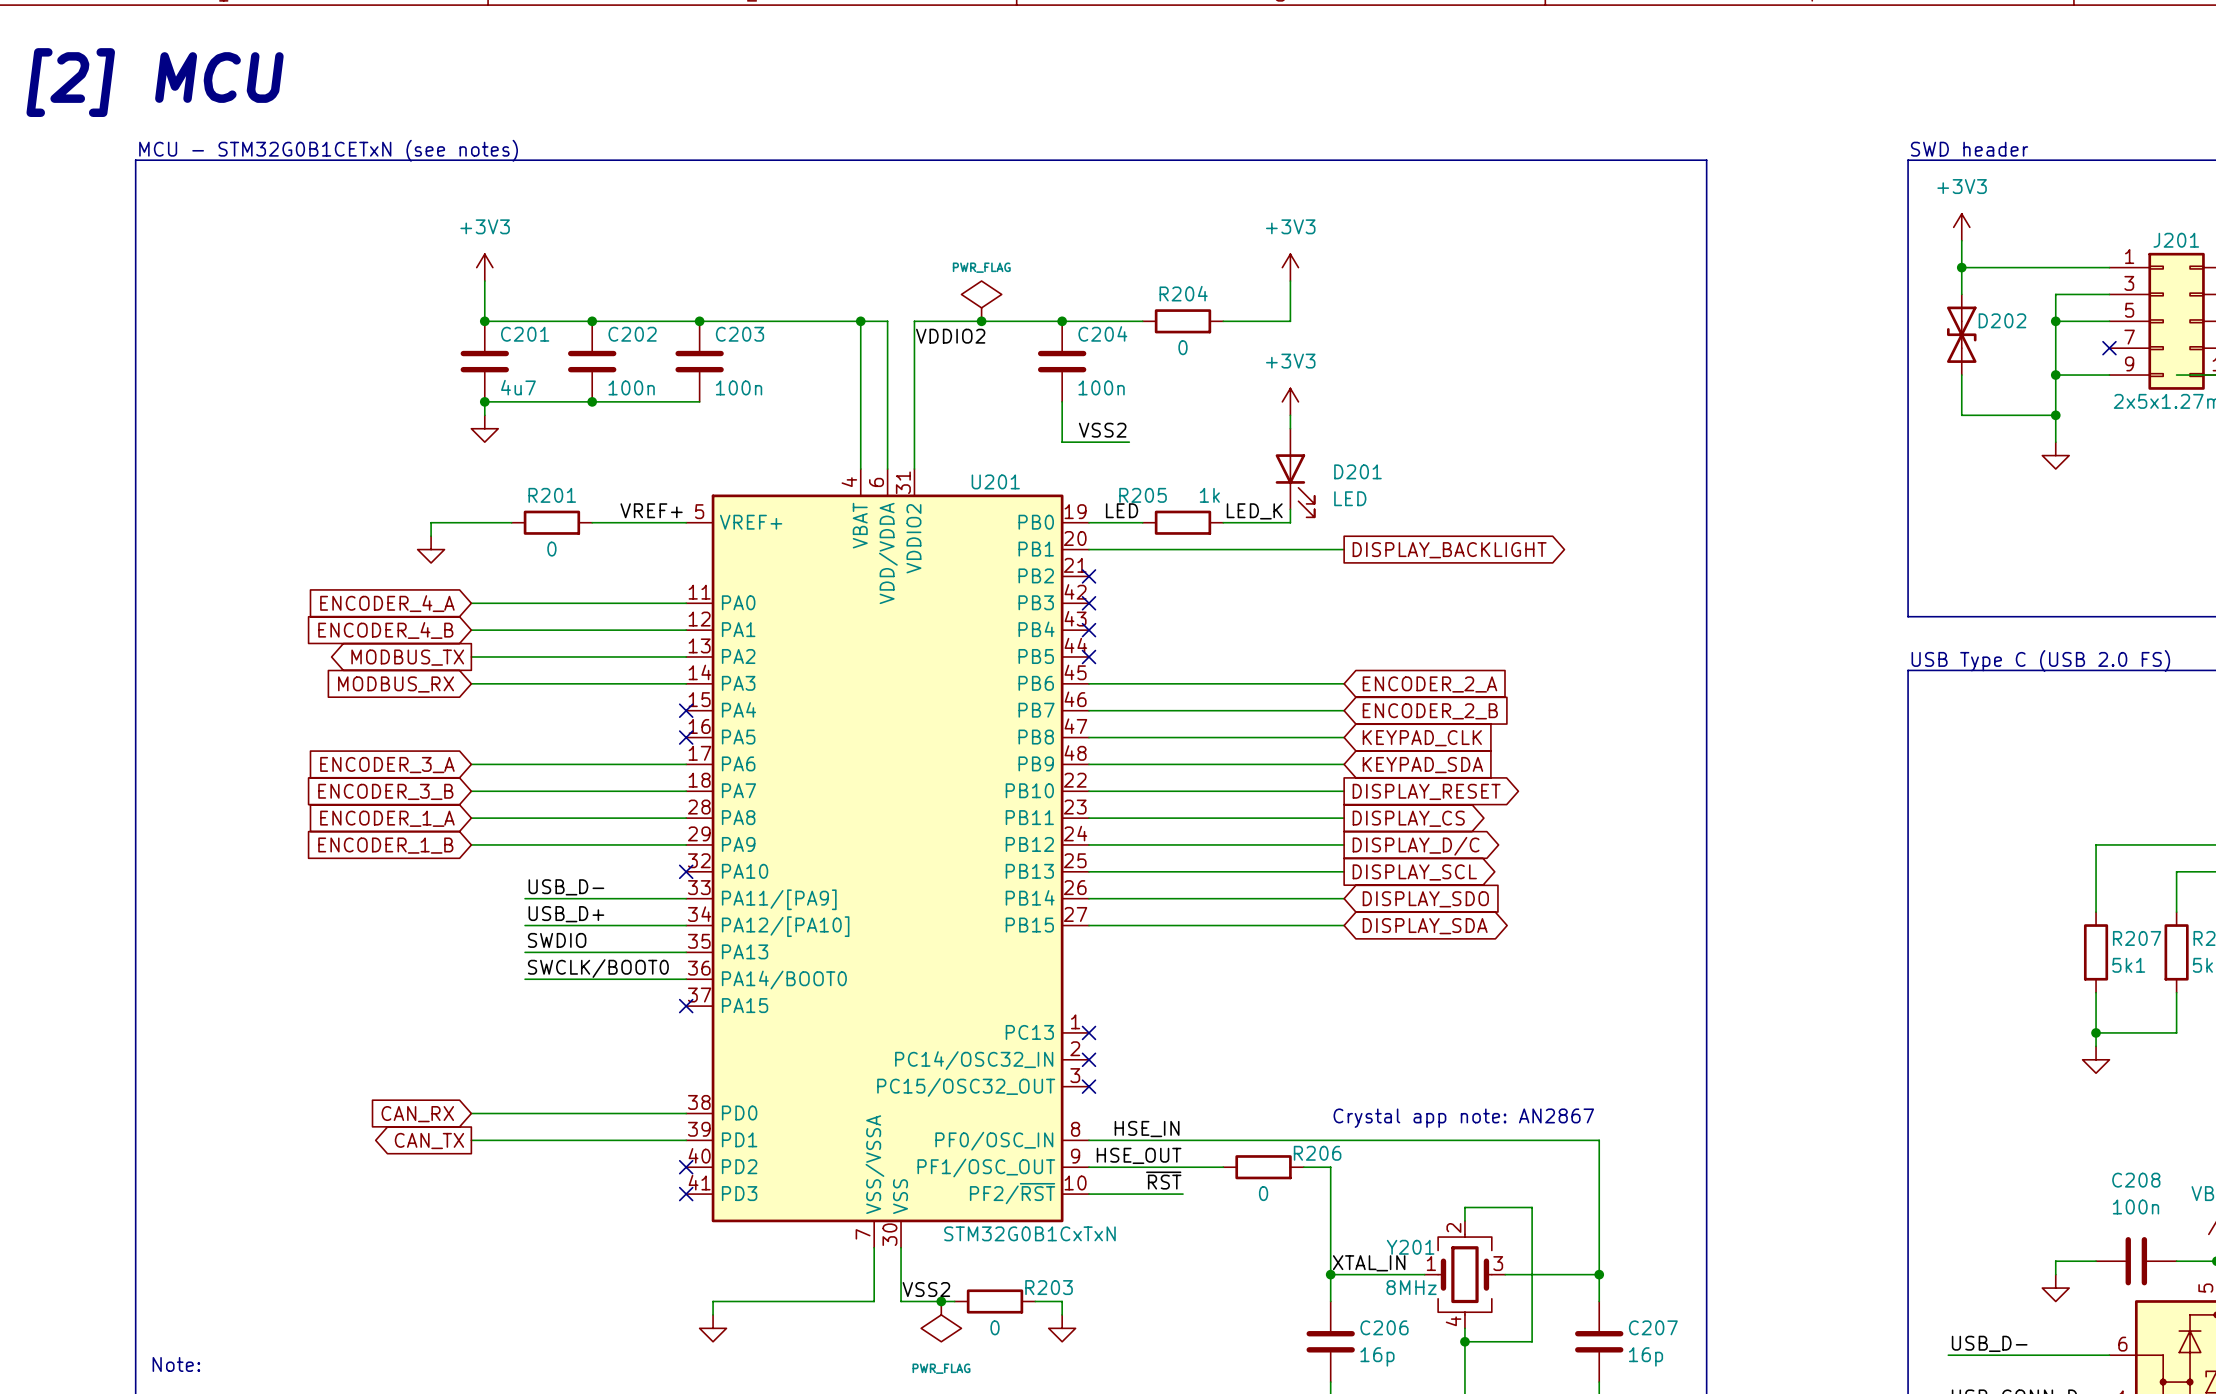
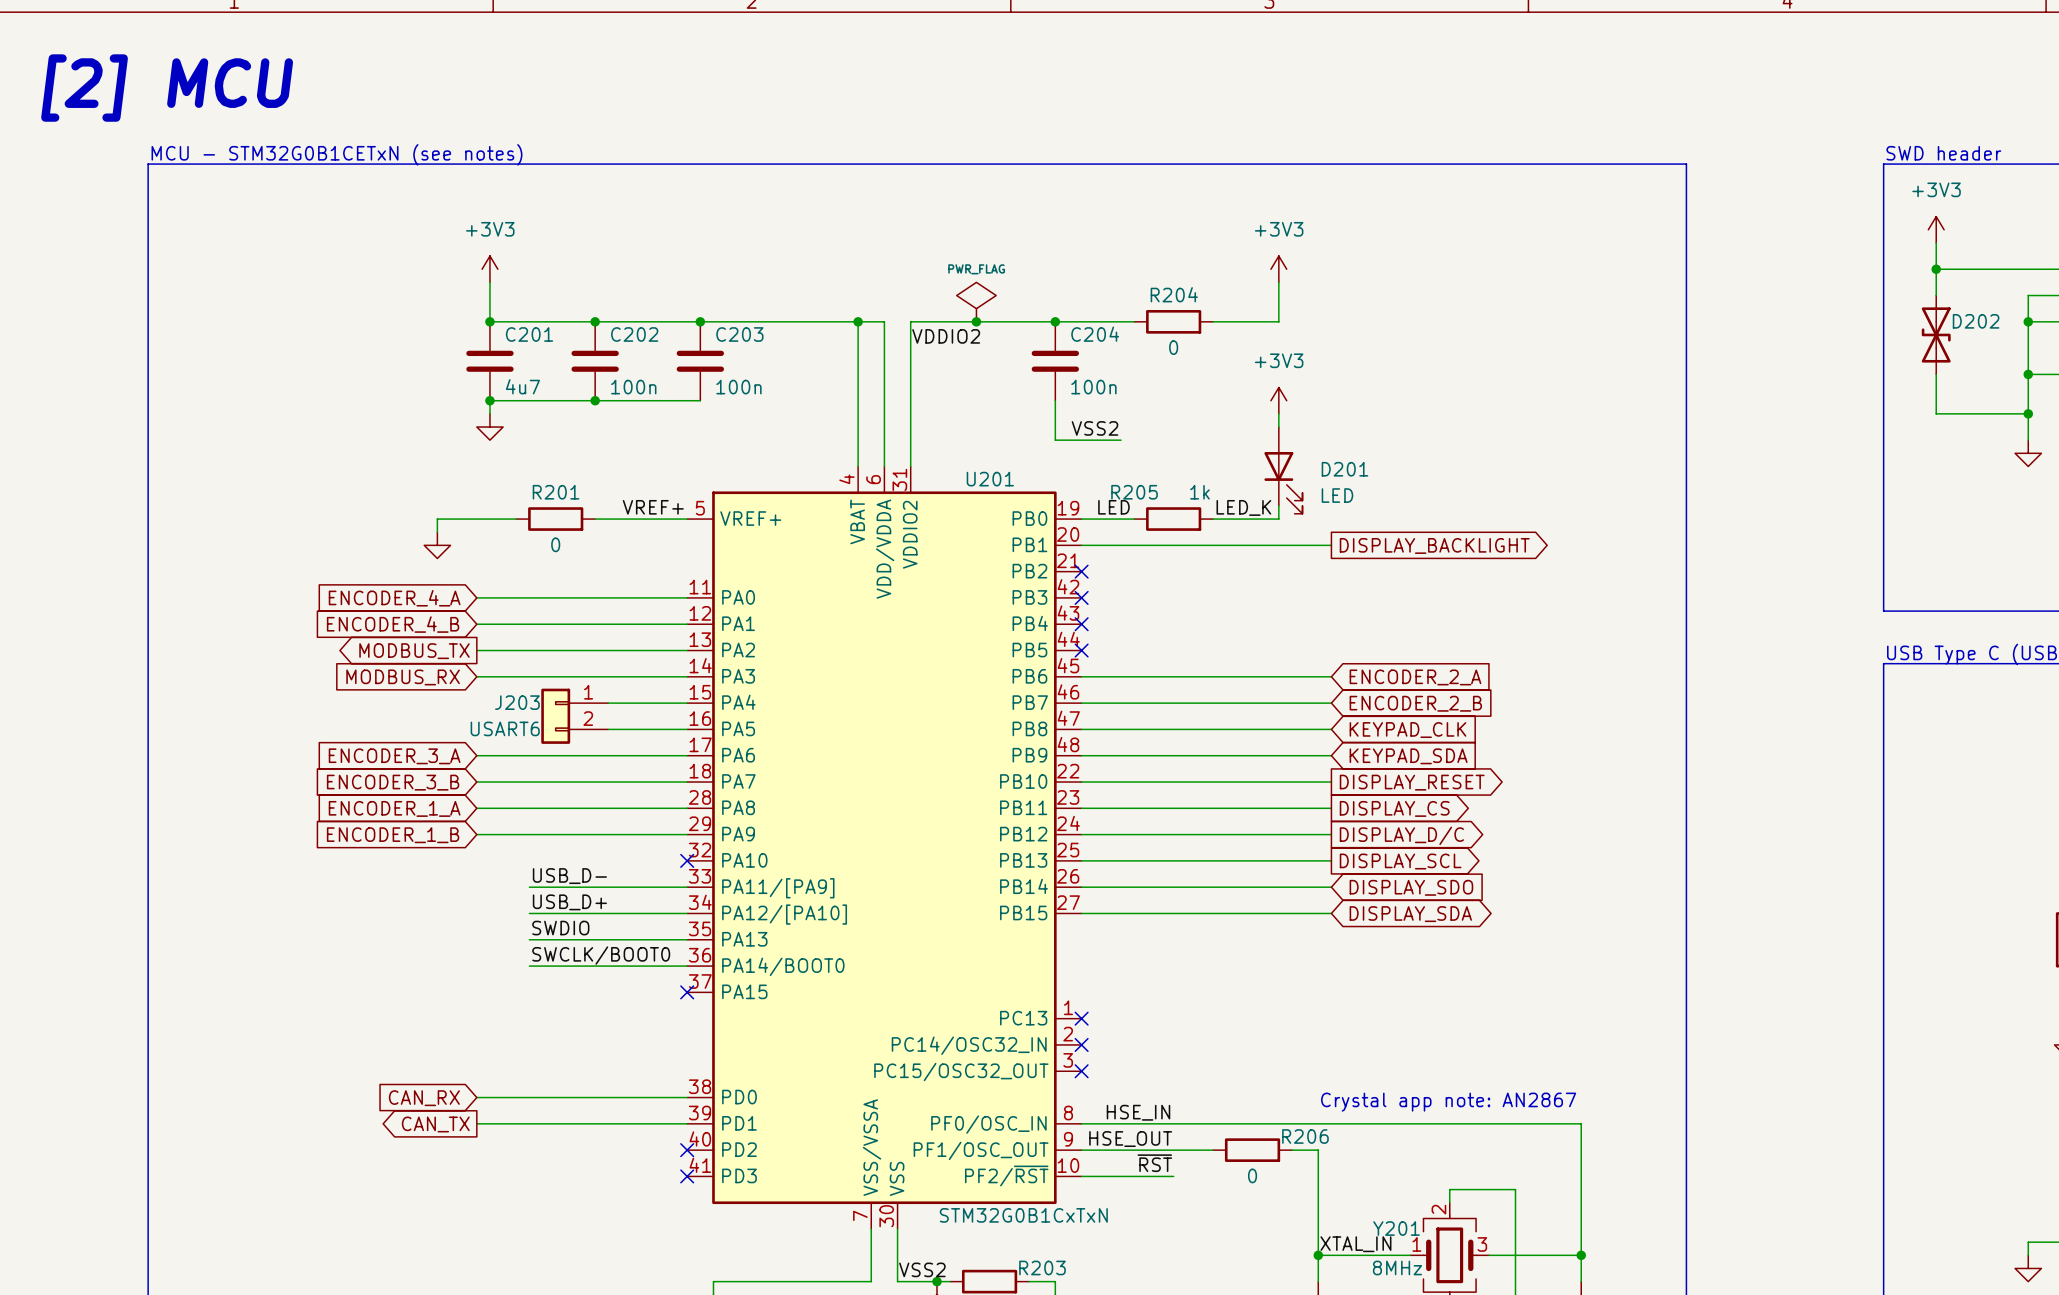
wire: none -> (608, 703) (687, 703)
no-connect mark: (686, 710) -> none
J203: none -> USART6 (574, 716)
wire: none -> (608, 729) (687, 729)
no-connect mark: (686, 737) -> none

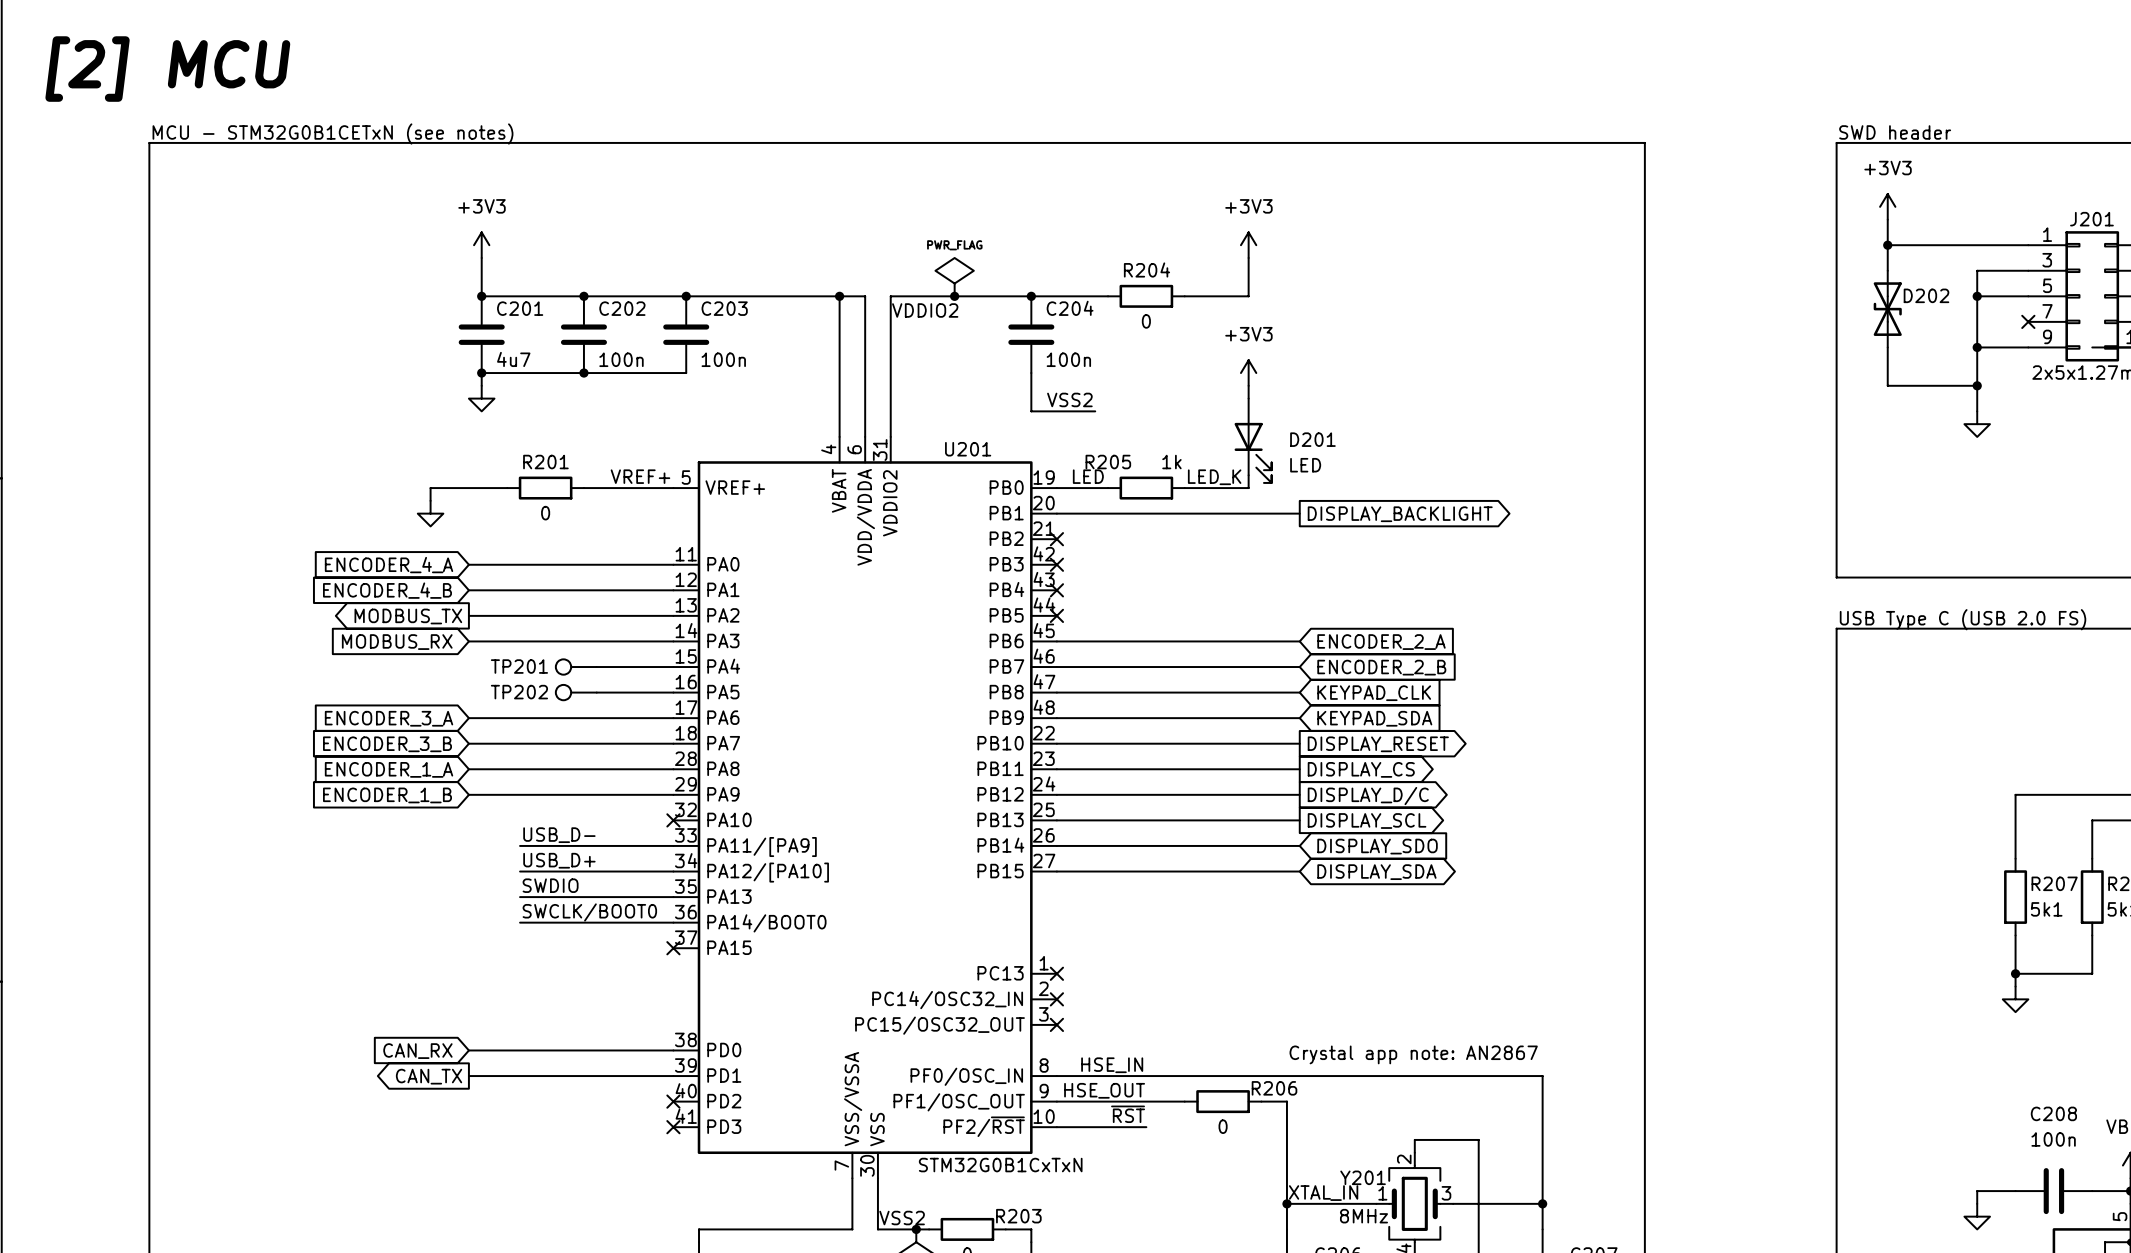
TP201: none -> (576, 667)
J203: USART6 (574, 716) -> none
TP202: none -> (576, 692)

